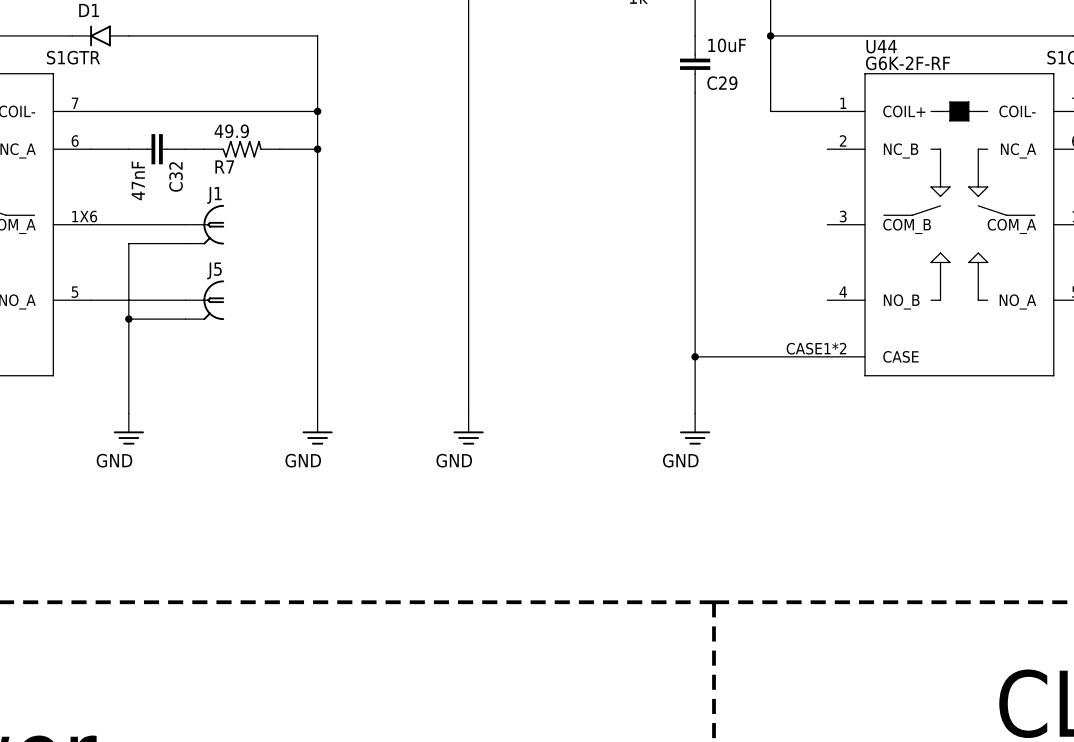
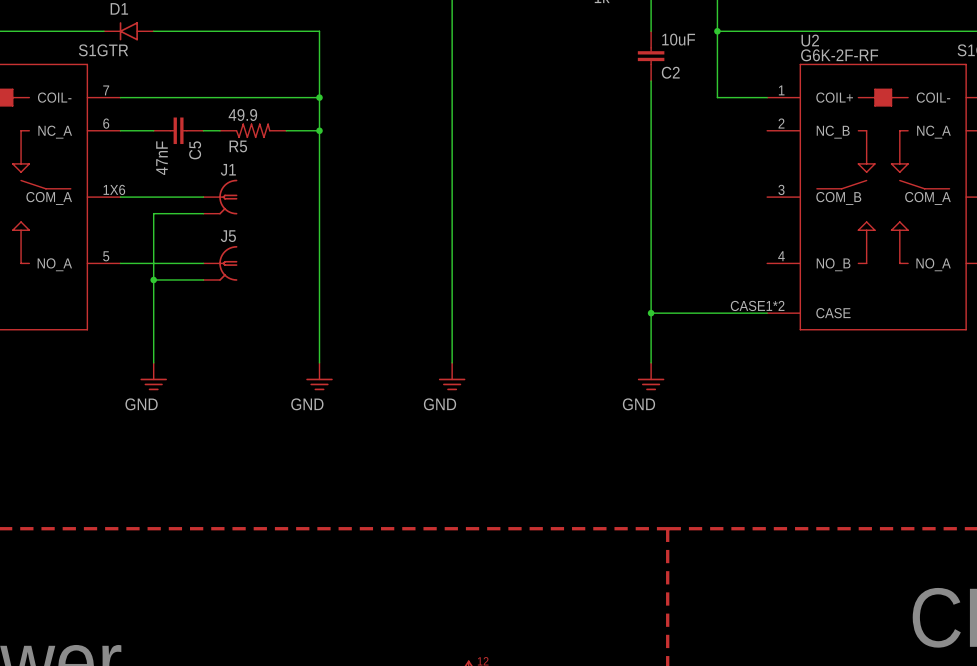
U44 name: U44 (881, 46) -> U2 (810, 40)
C29 name: C29 (722, 83) -> C2 (670, 72)
R7 name: R7 (224, 166) -> R5 (238, 146)
C32 name: C32 (176, 176) -> C5 (195, 150)

